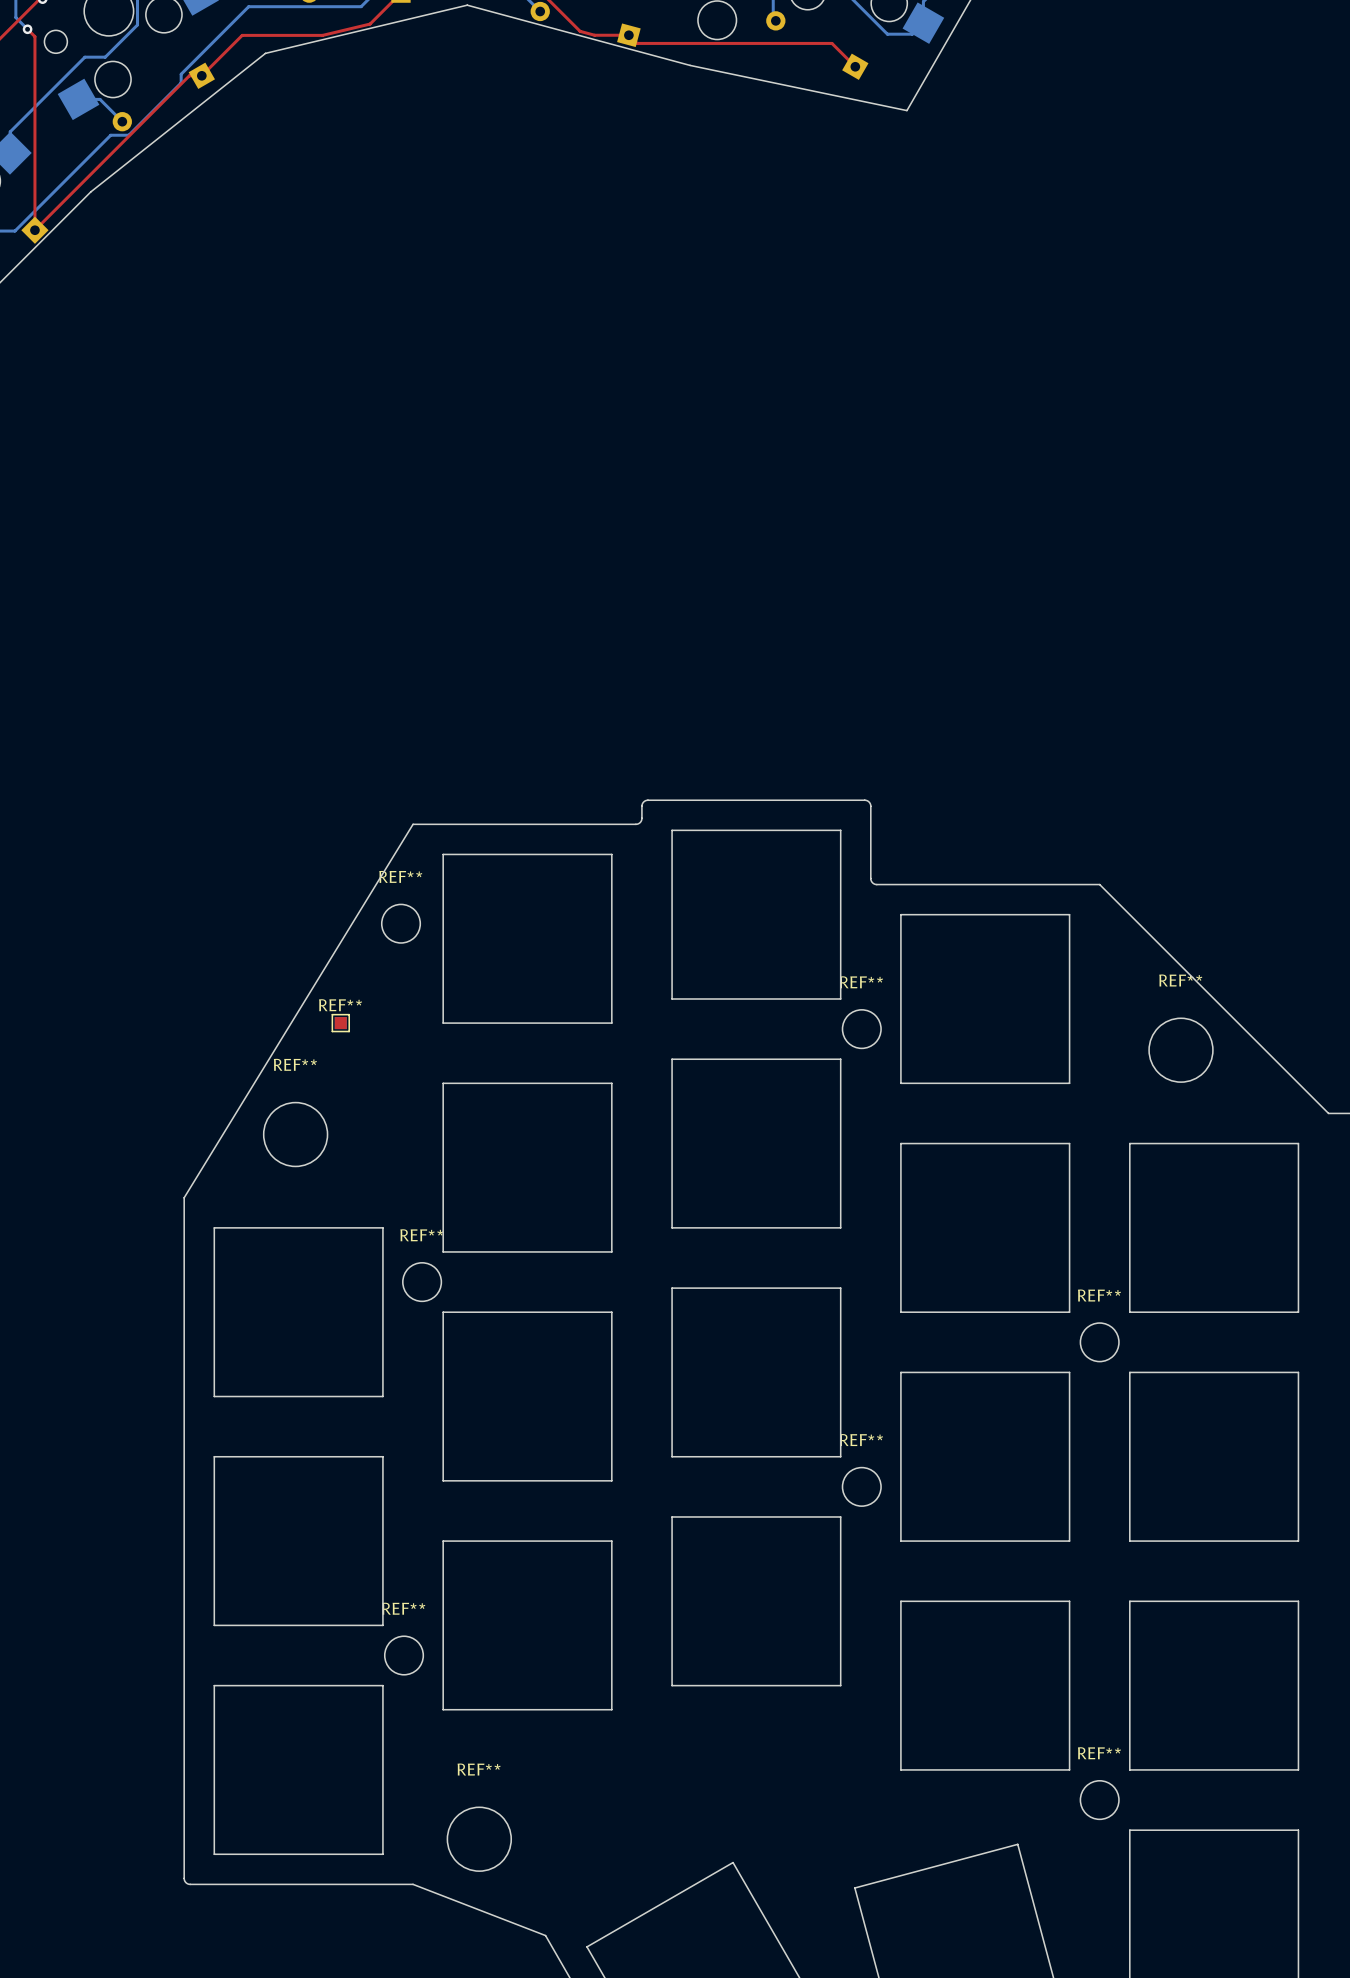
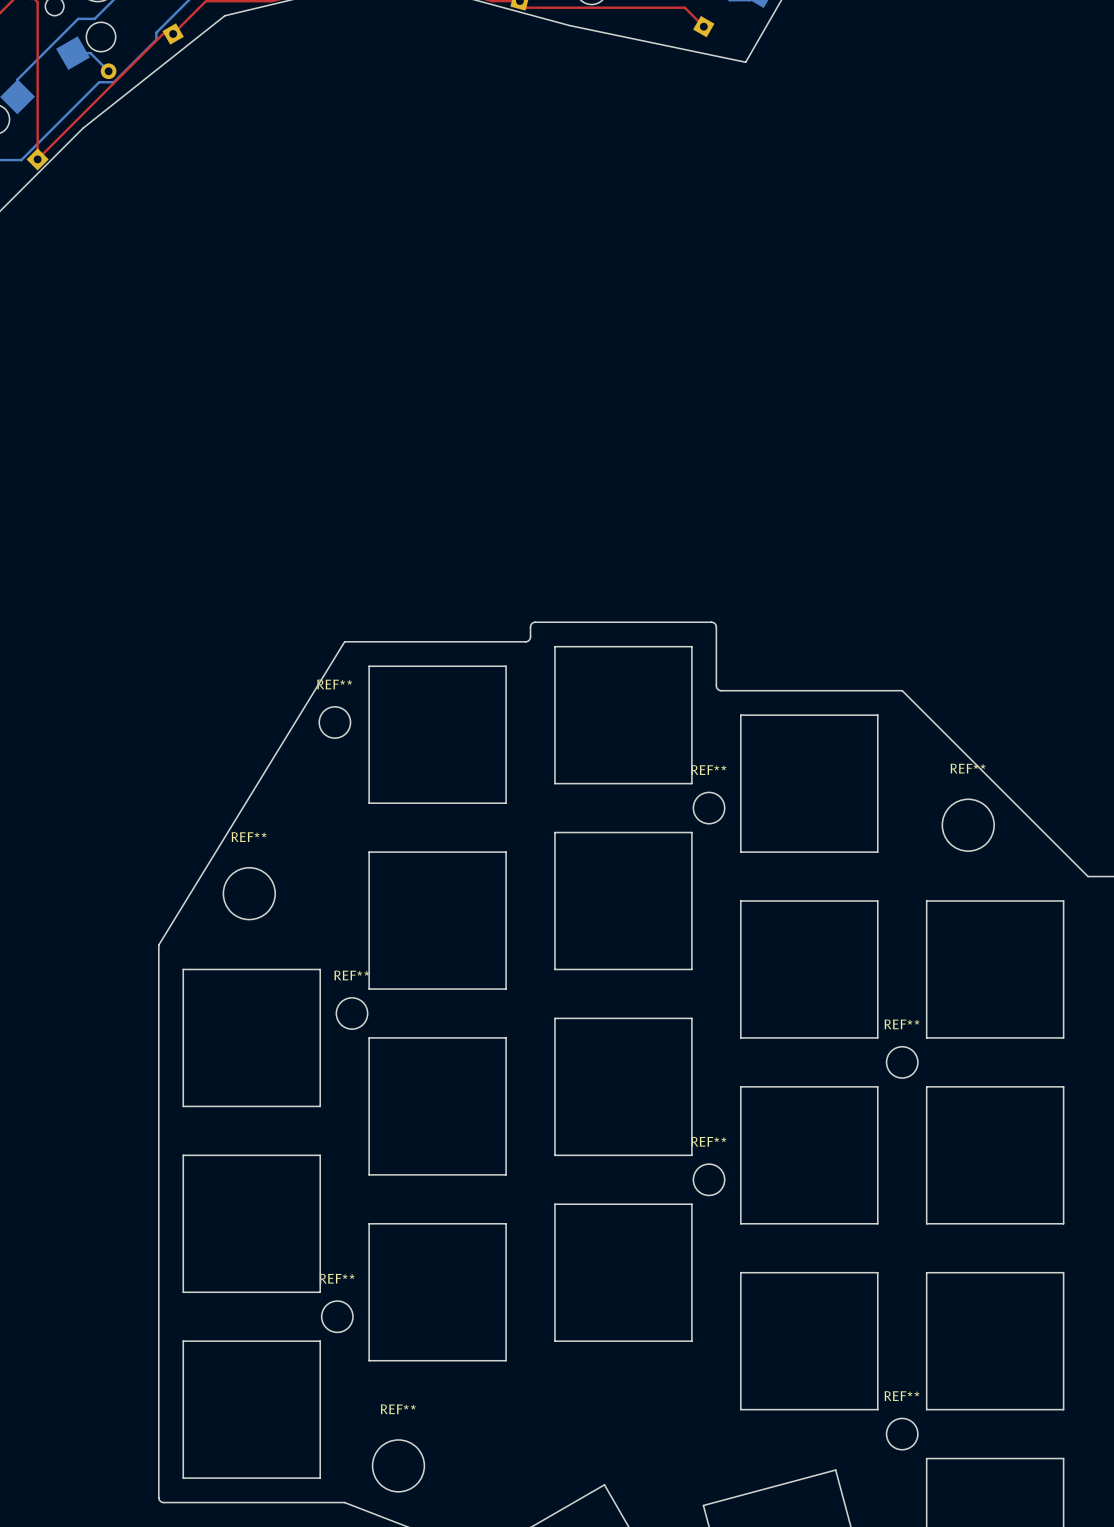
REF**: (340, 1023) -> none

